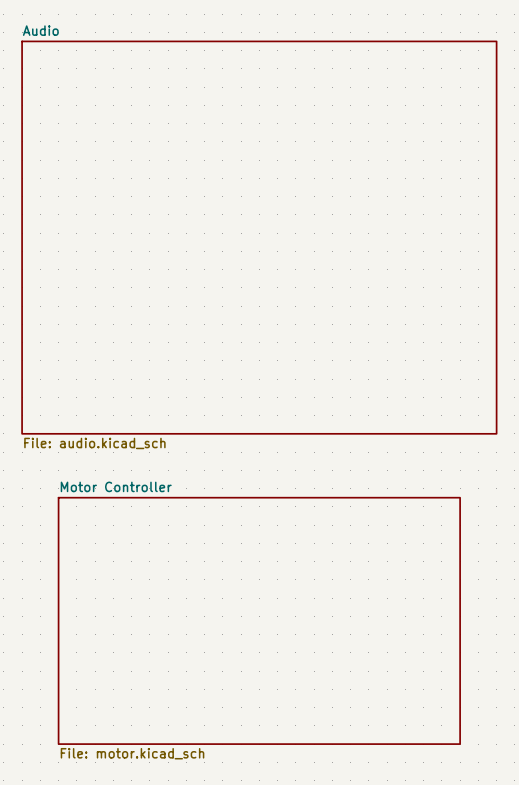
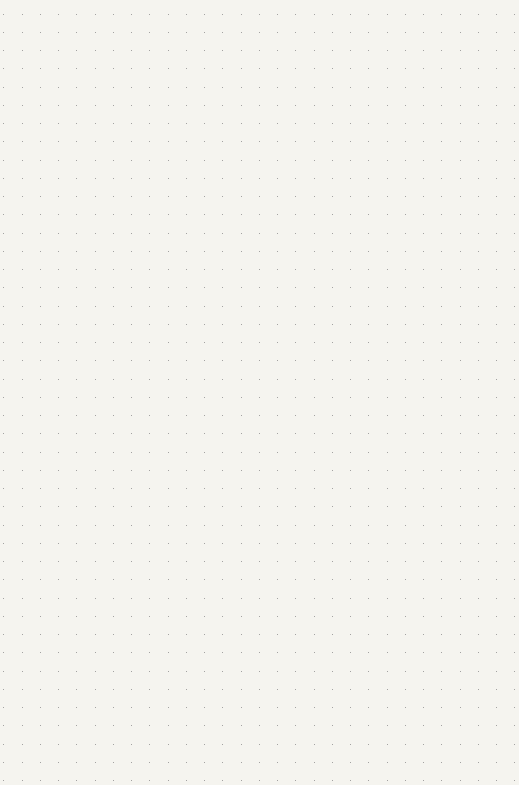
sheet Audio: File: audio.kicad_sch (259, 237) -> none
sheet Motor Controller: File: motor.kicad_sch (259, 620) -> none

